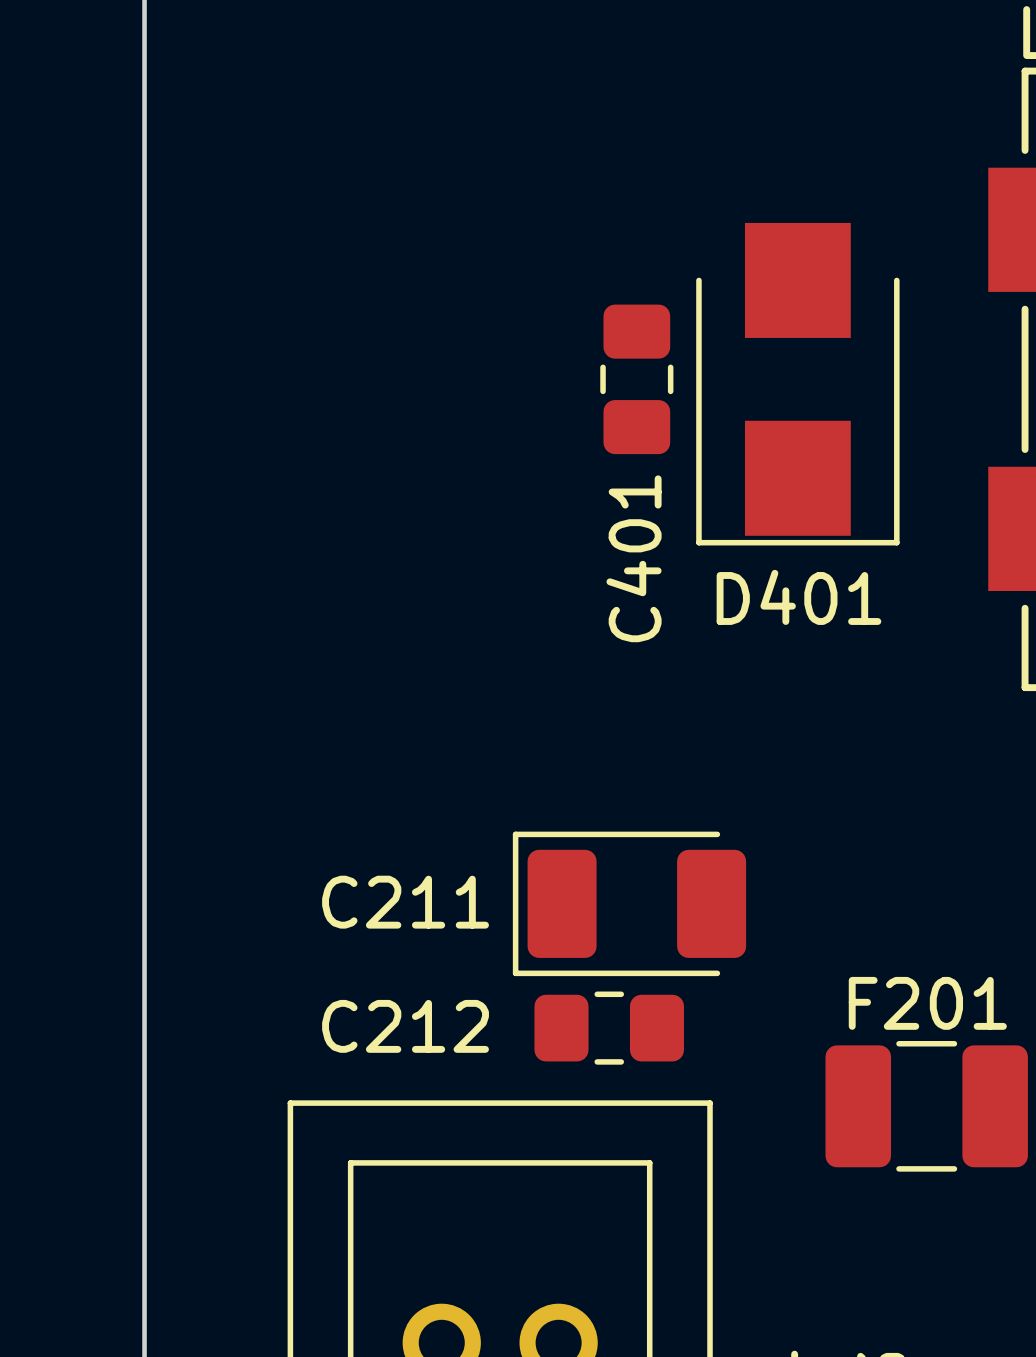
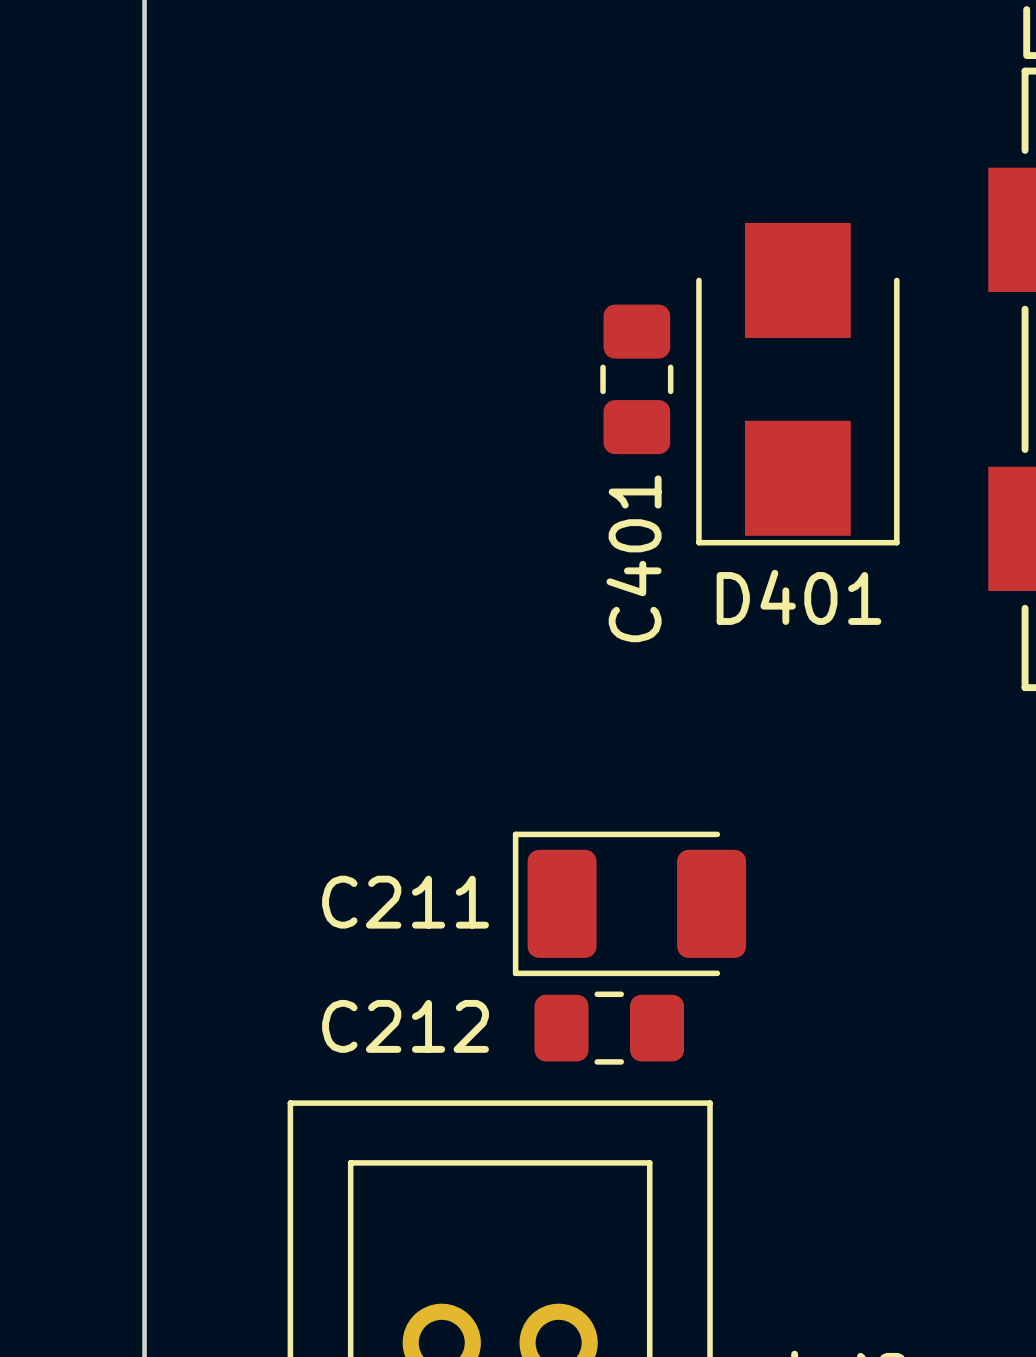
F201: (926, 1106) -> none

